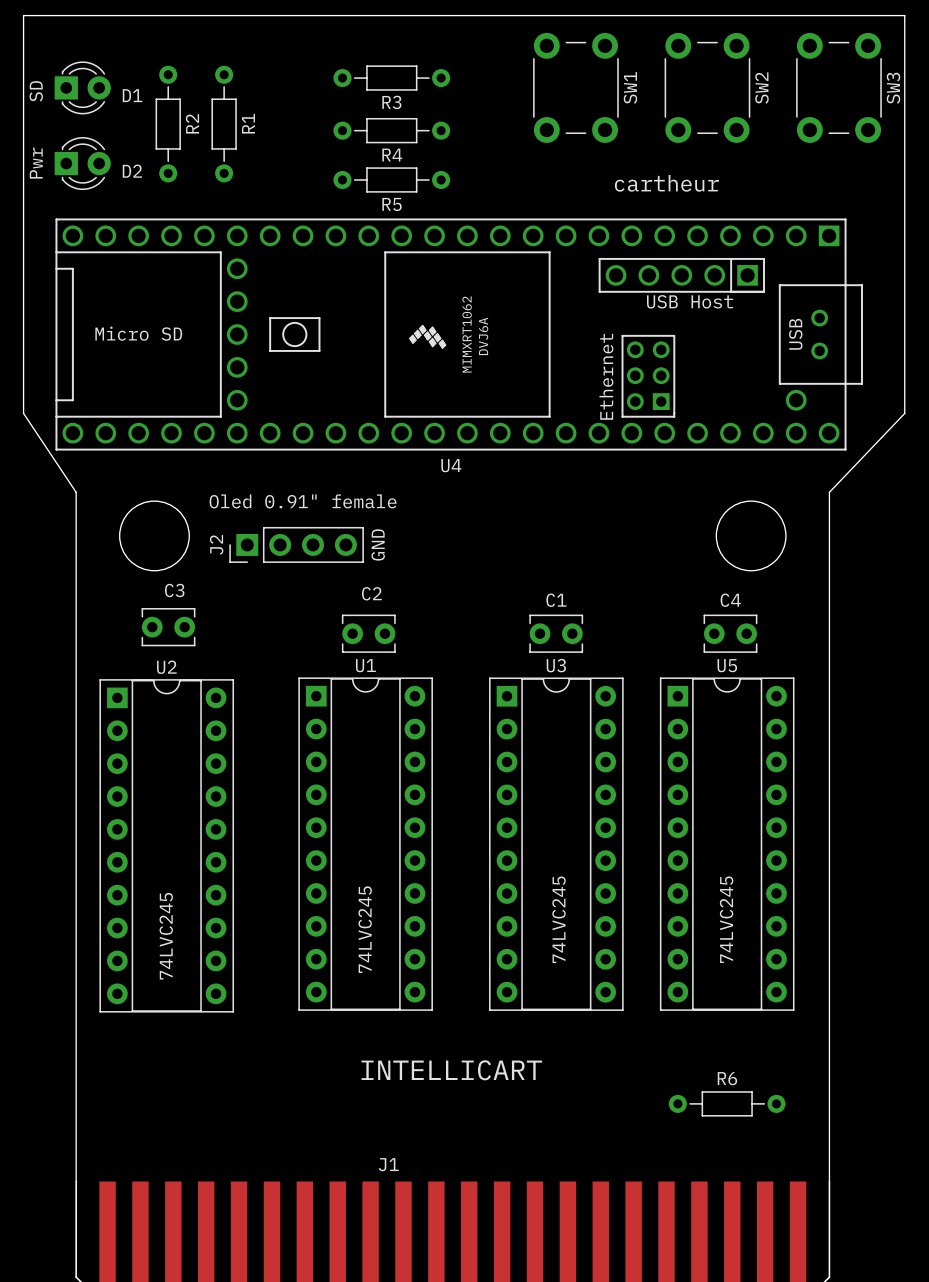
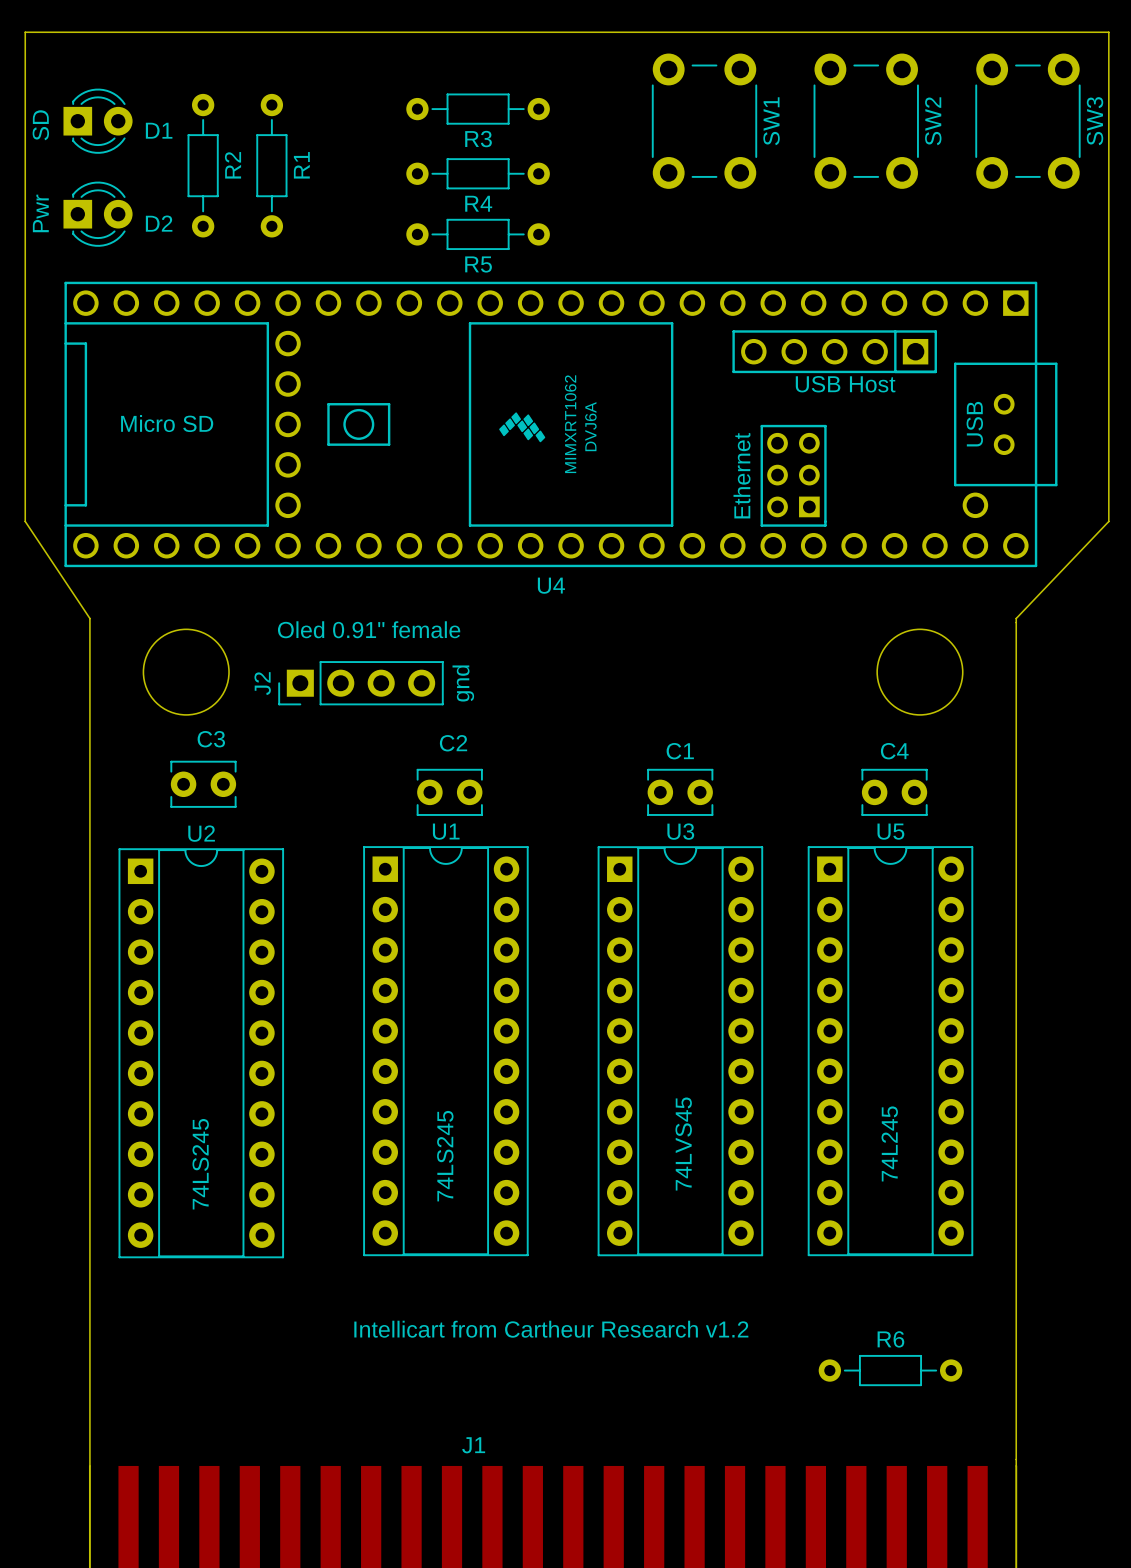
text: cartheur (666, 183) -> none
text: GND (378, 544) -> gnd (463, 683)
U3 value: 74LVC245 (559, 919) -> 74LVS45 (683, 1144)
U5 value: 74LVC245 (726, 919) -> 74L245 (889, 1143)
U1 value: 74LVC245 (365, 929) -> 74LS245 (445, 1156)
U2 value: 74LVC245 (166, 936) -> 74LS245 (200, 1164)
text: INTELLICART (451, 1070) -> Intellicart from Cartheur Research v1.2 (551, 1329)

